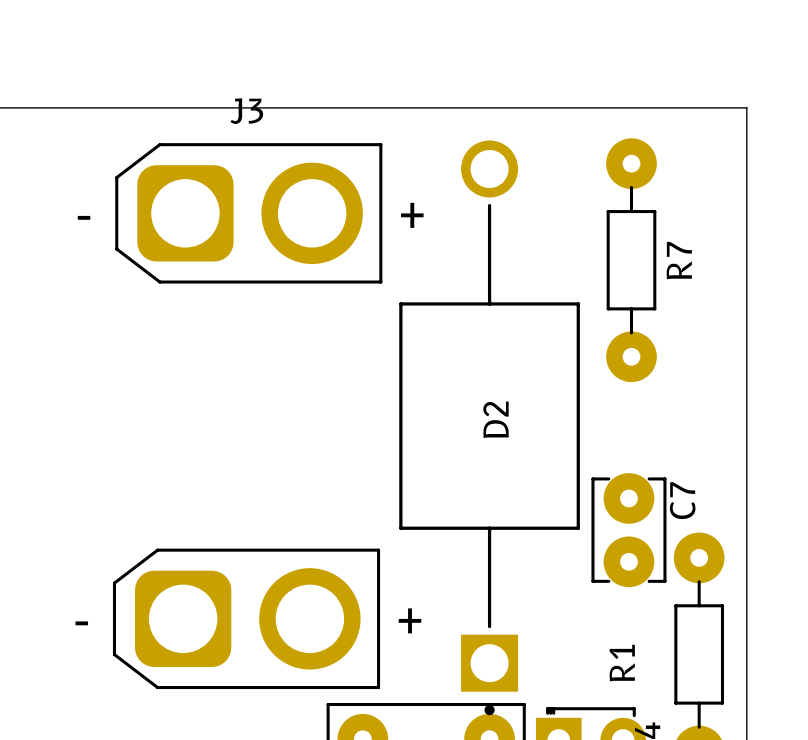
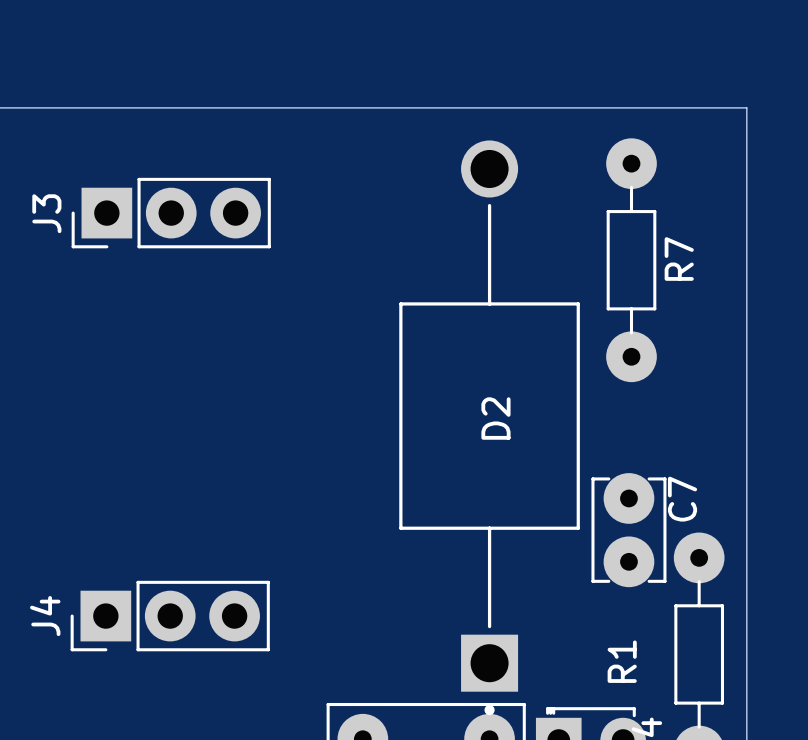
J3 name position: J3 (246, 111) -> J3 (46, 213)
J3 footprint: [115, 143, 383, 284] -> [71, 177, 271, 249]
J4: none -> (170, 616)
part: (246, 618) -> none

